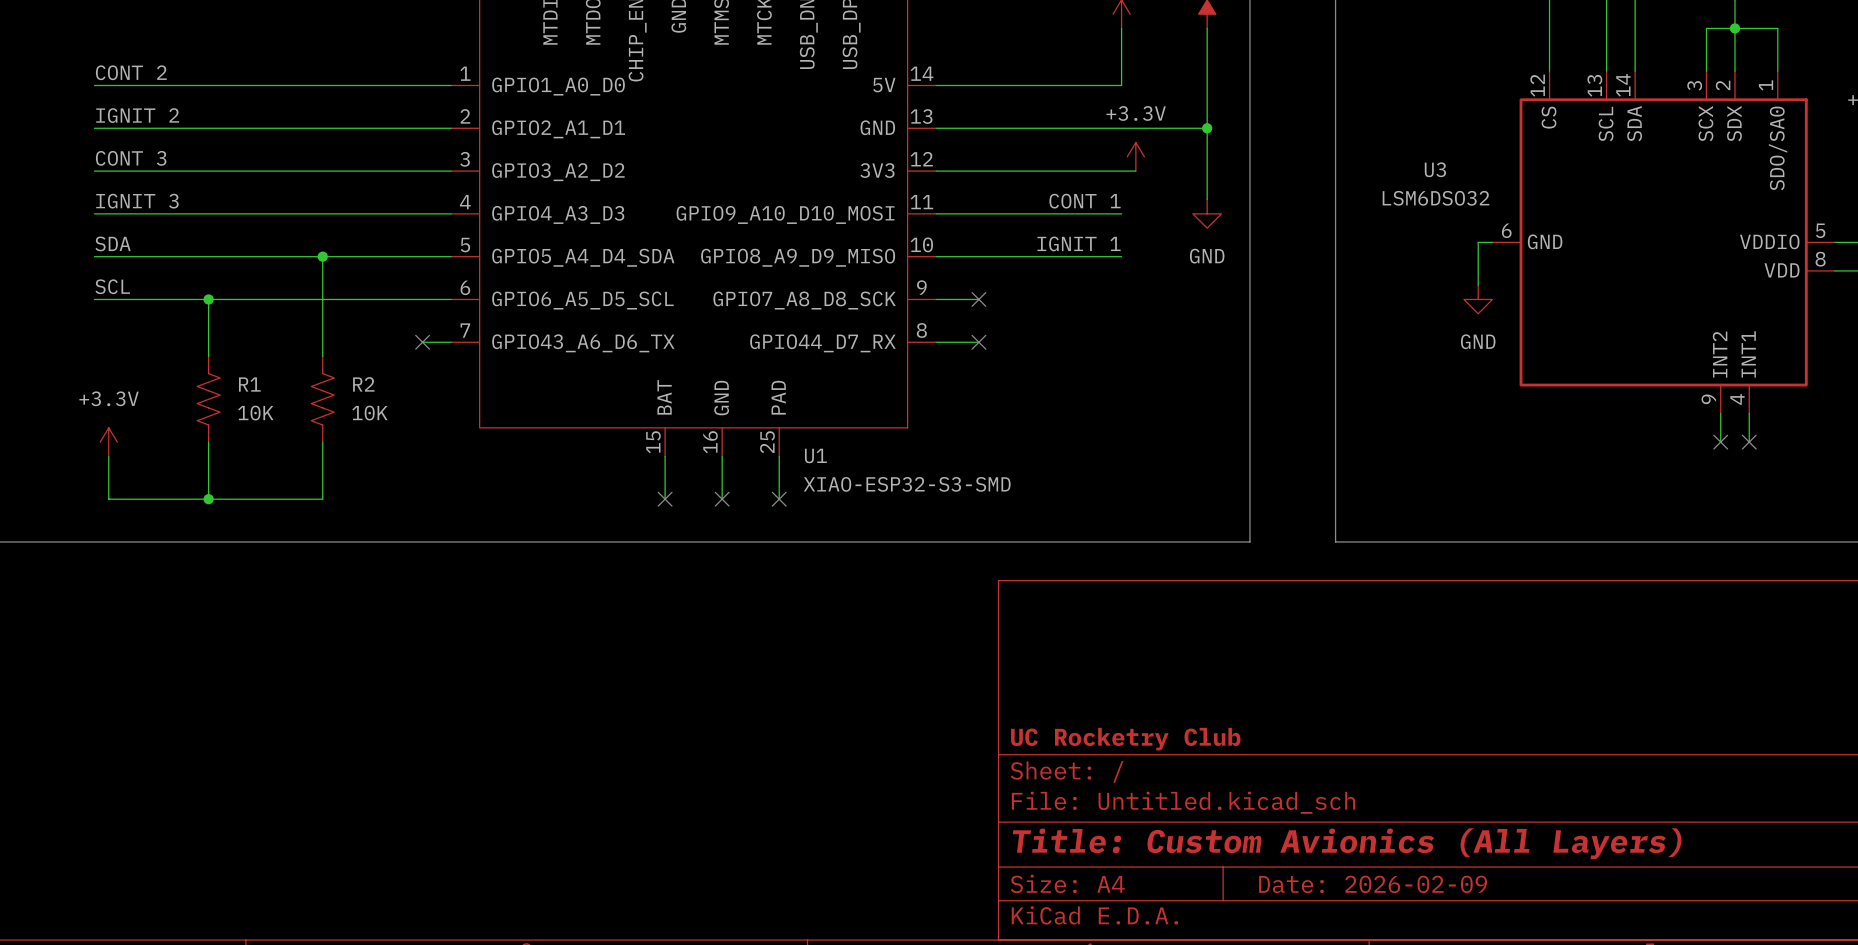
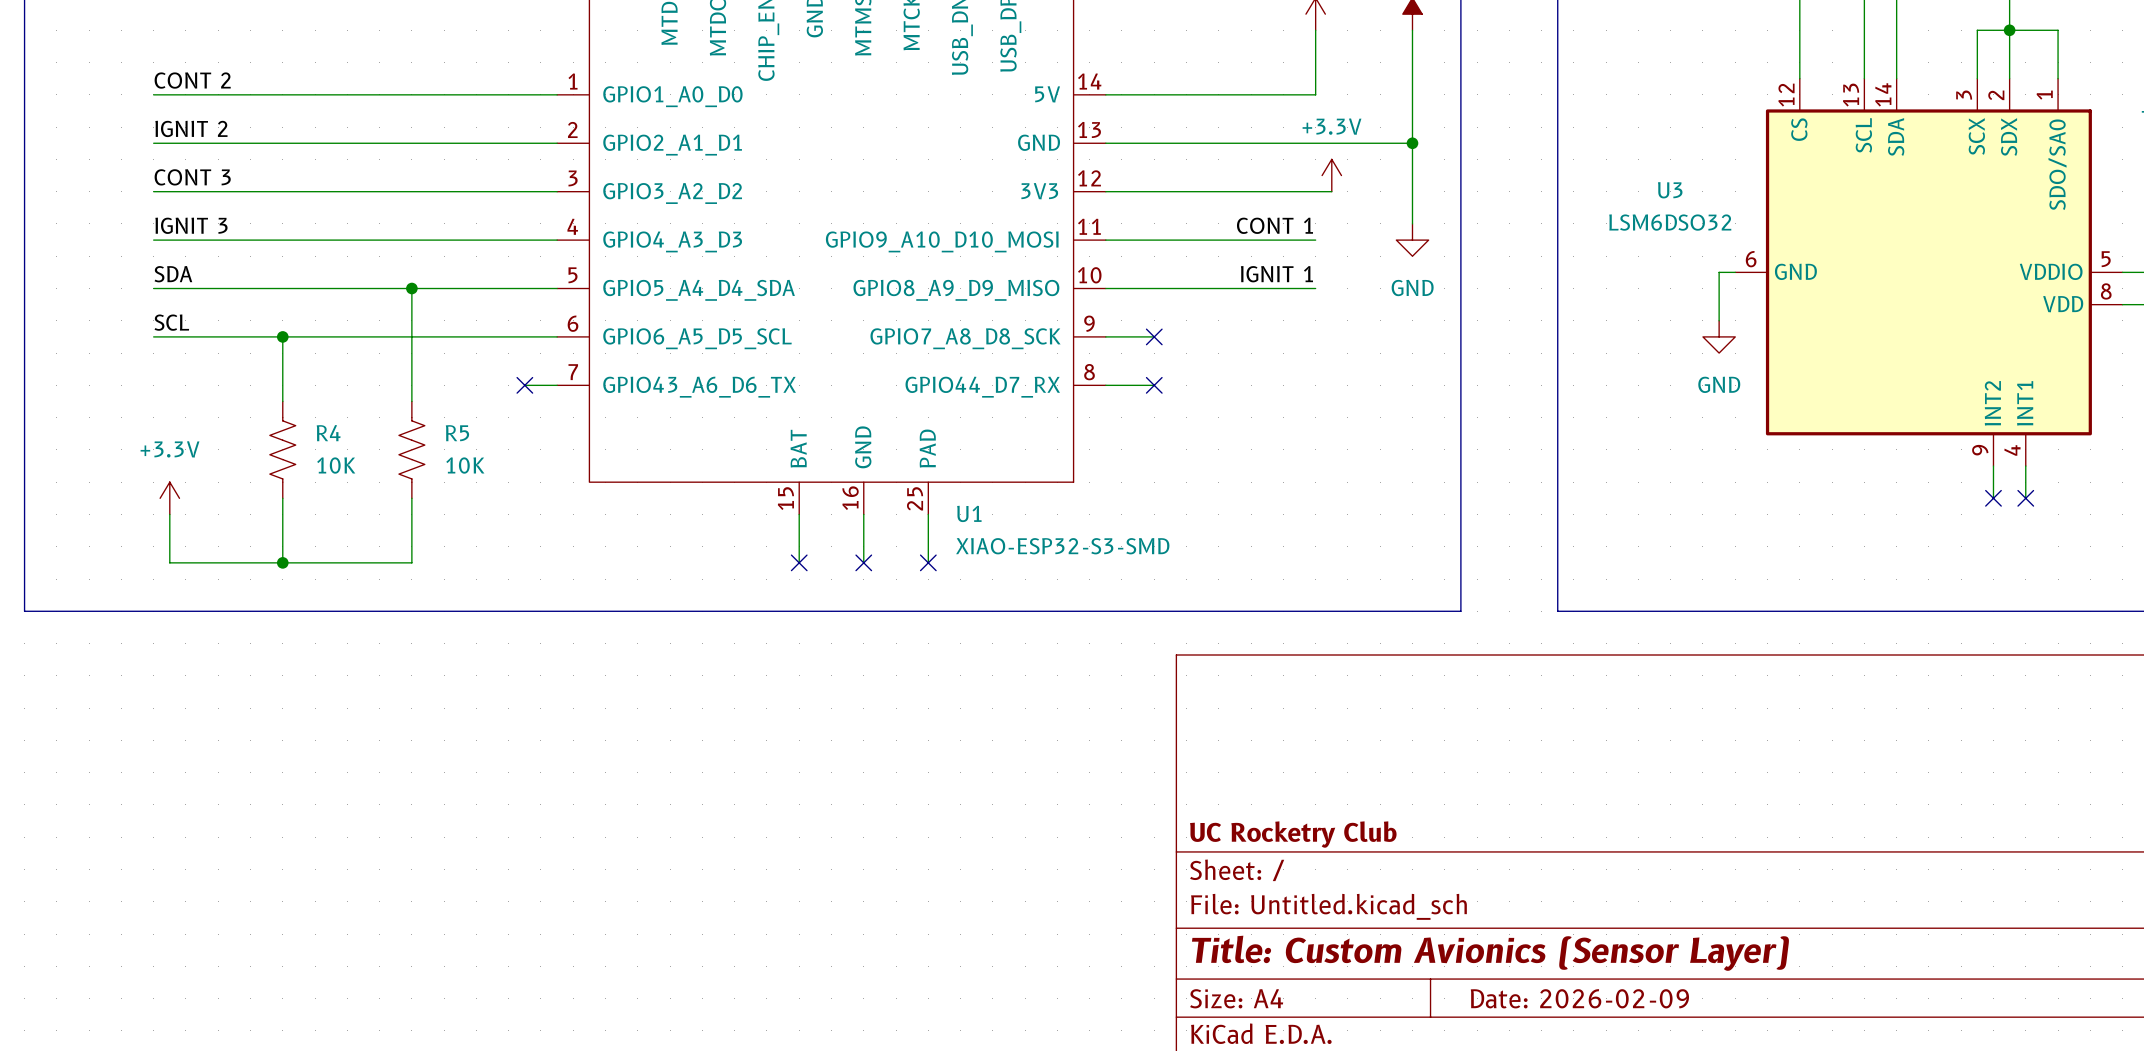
R1 name: R1 (249, 384) -> R4 (328, 433)
R2 name: R2 (363, 384) -> R5 (457, 433)
title block: Title: Custom Avionics (All Layers) (1347, 843) -> Title: Custom Avionics (Sensor Layer) (1490, 953)

